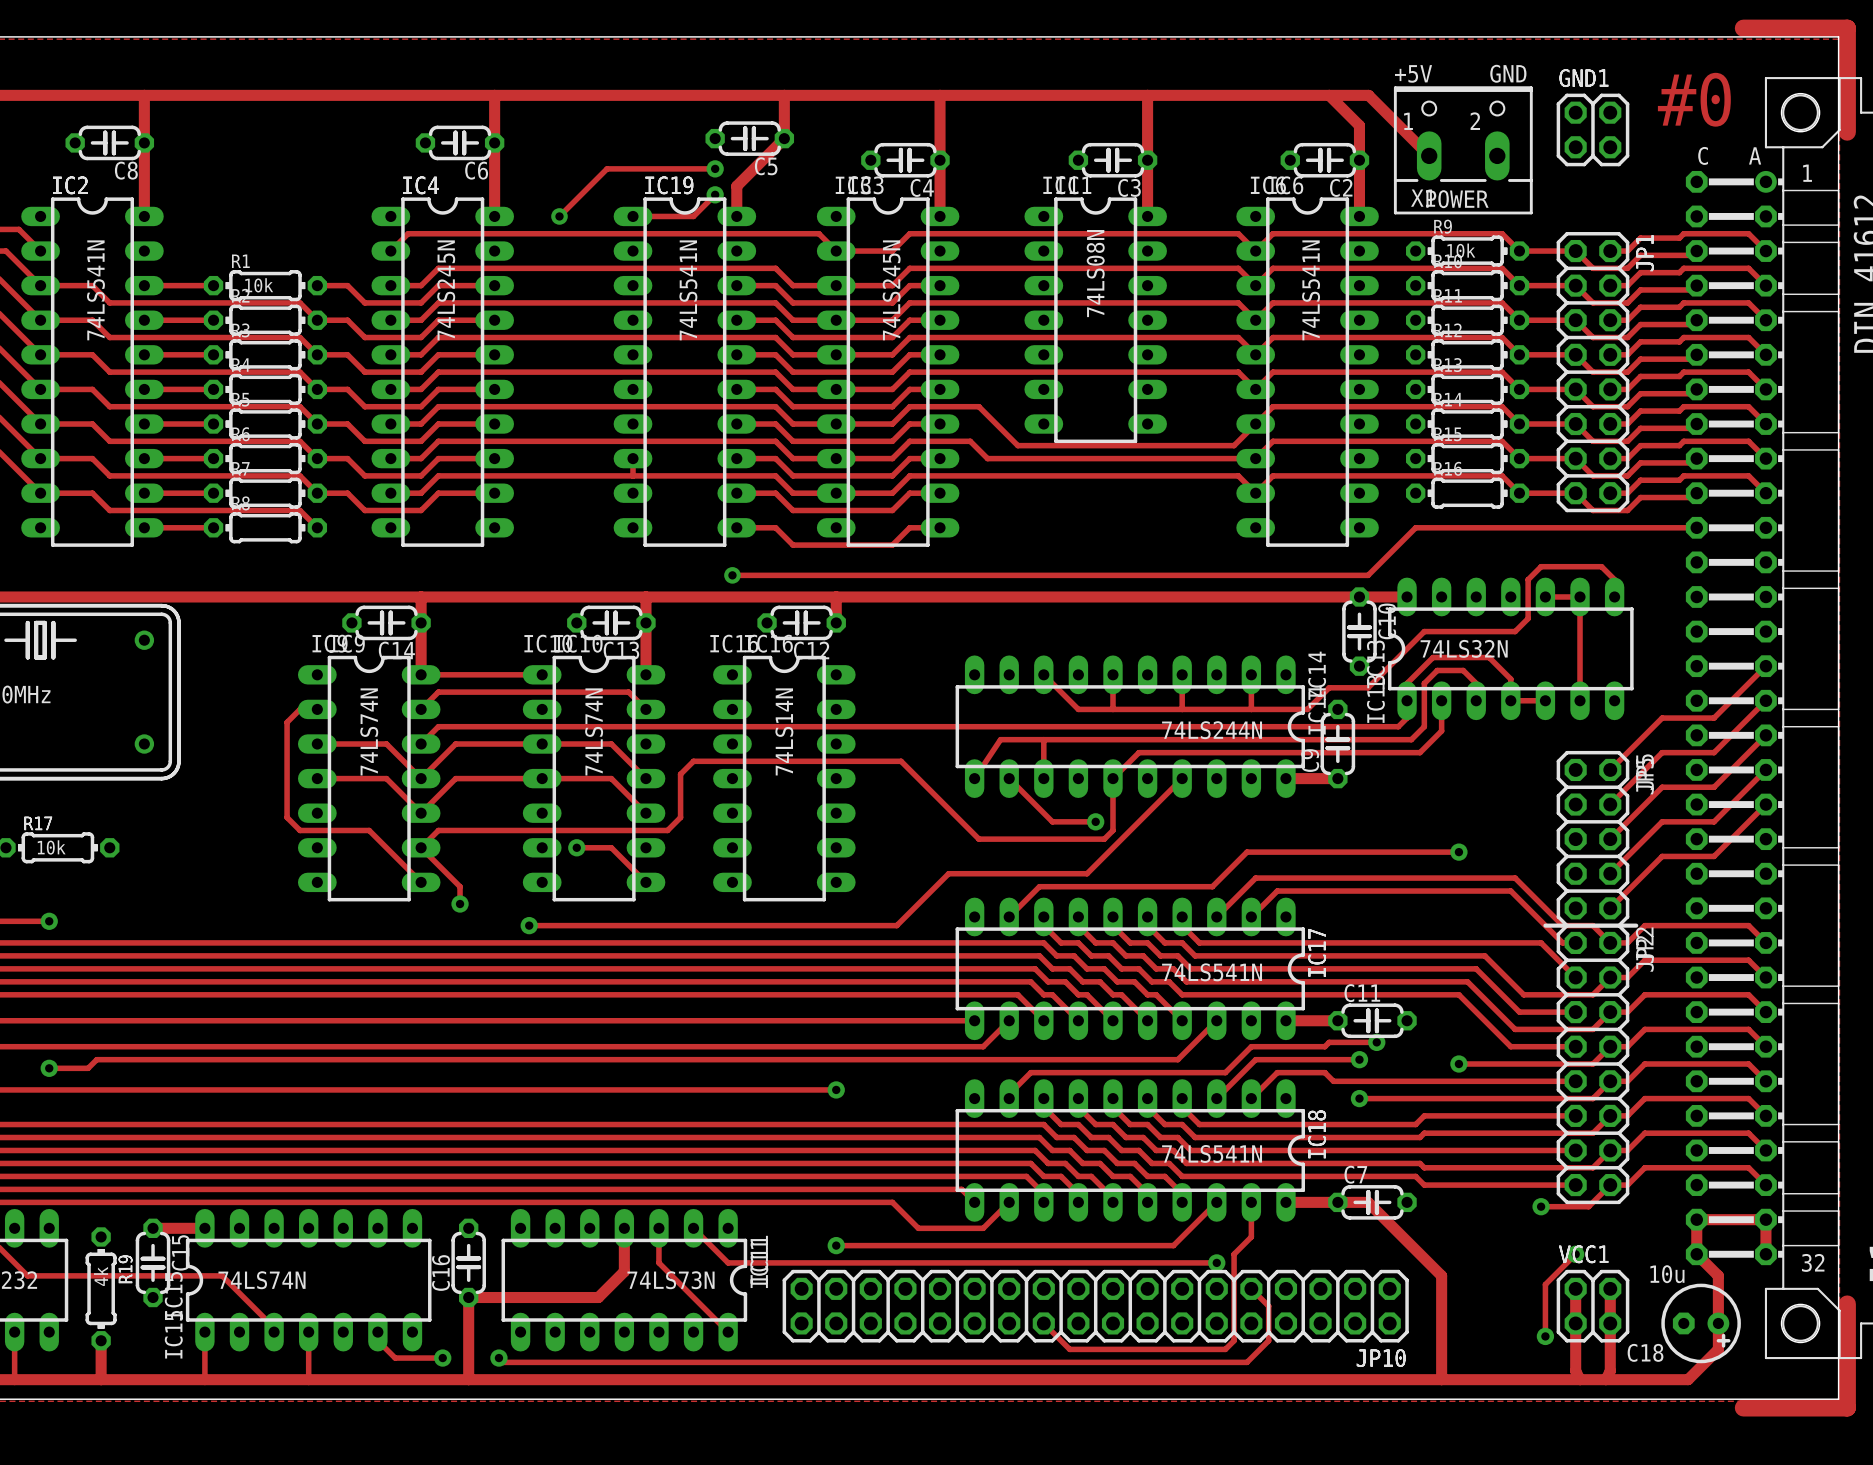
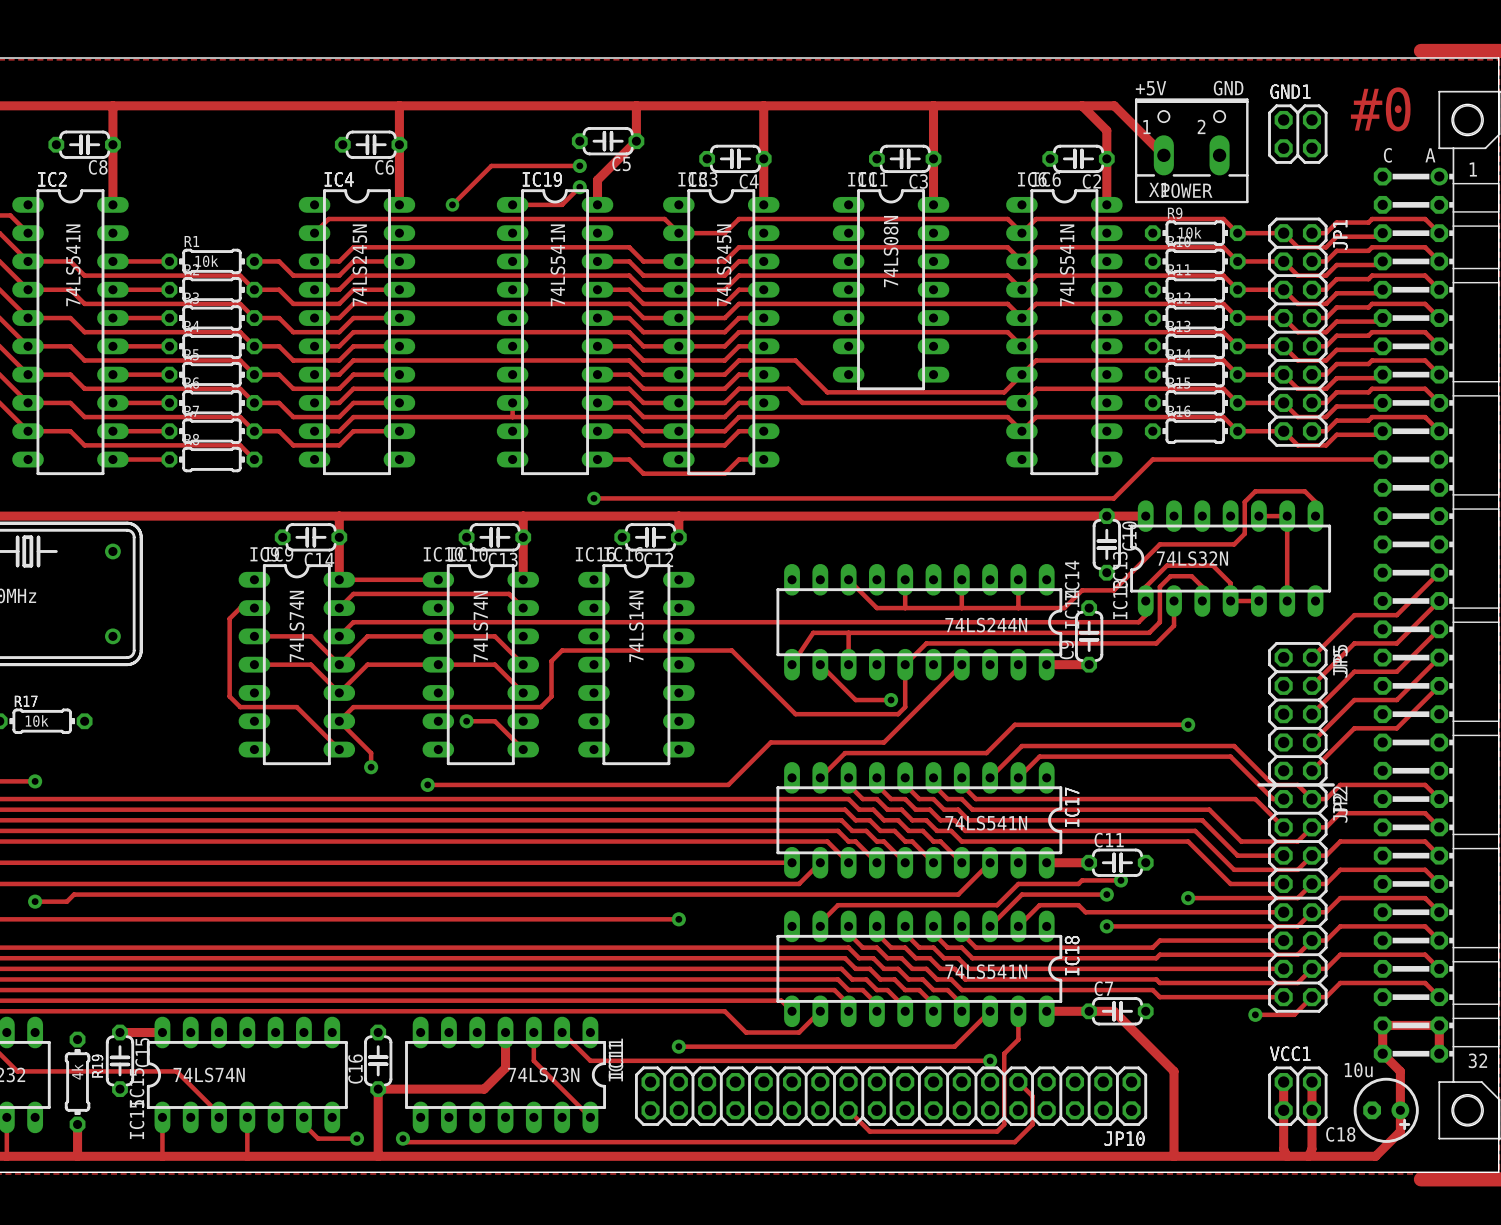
track: (1575, 1254) (1545, 1284) (1545, 1336) -> none
via: (1575, 1254) -> none
via: (1545, 1336) -> none

